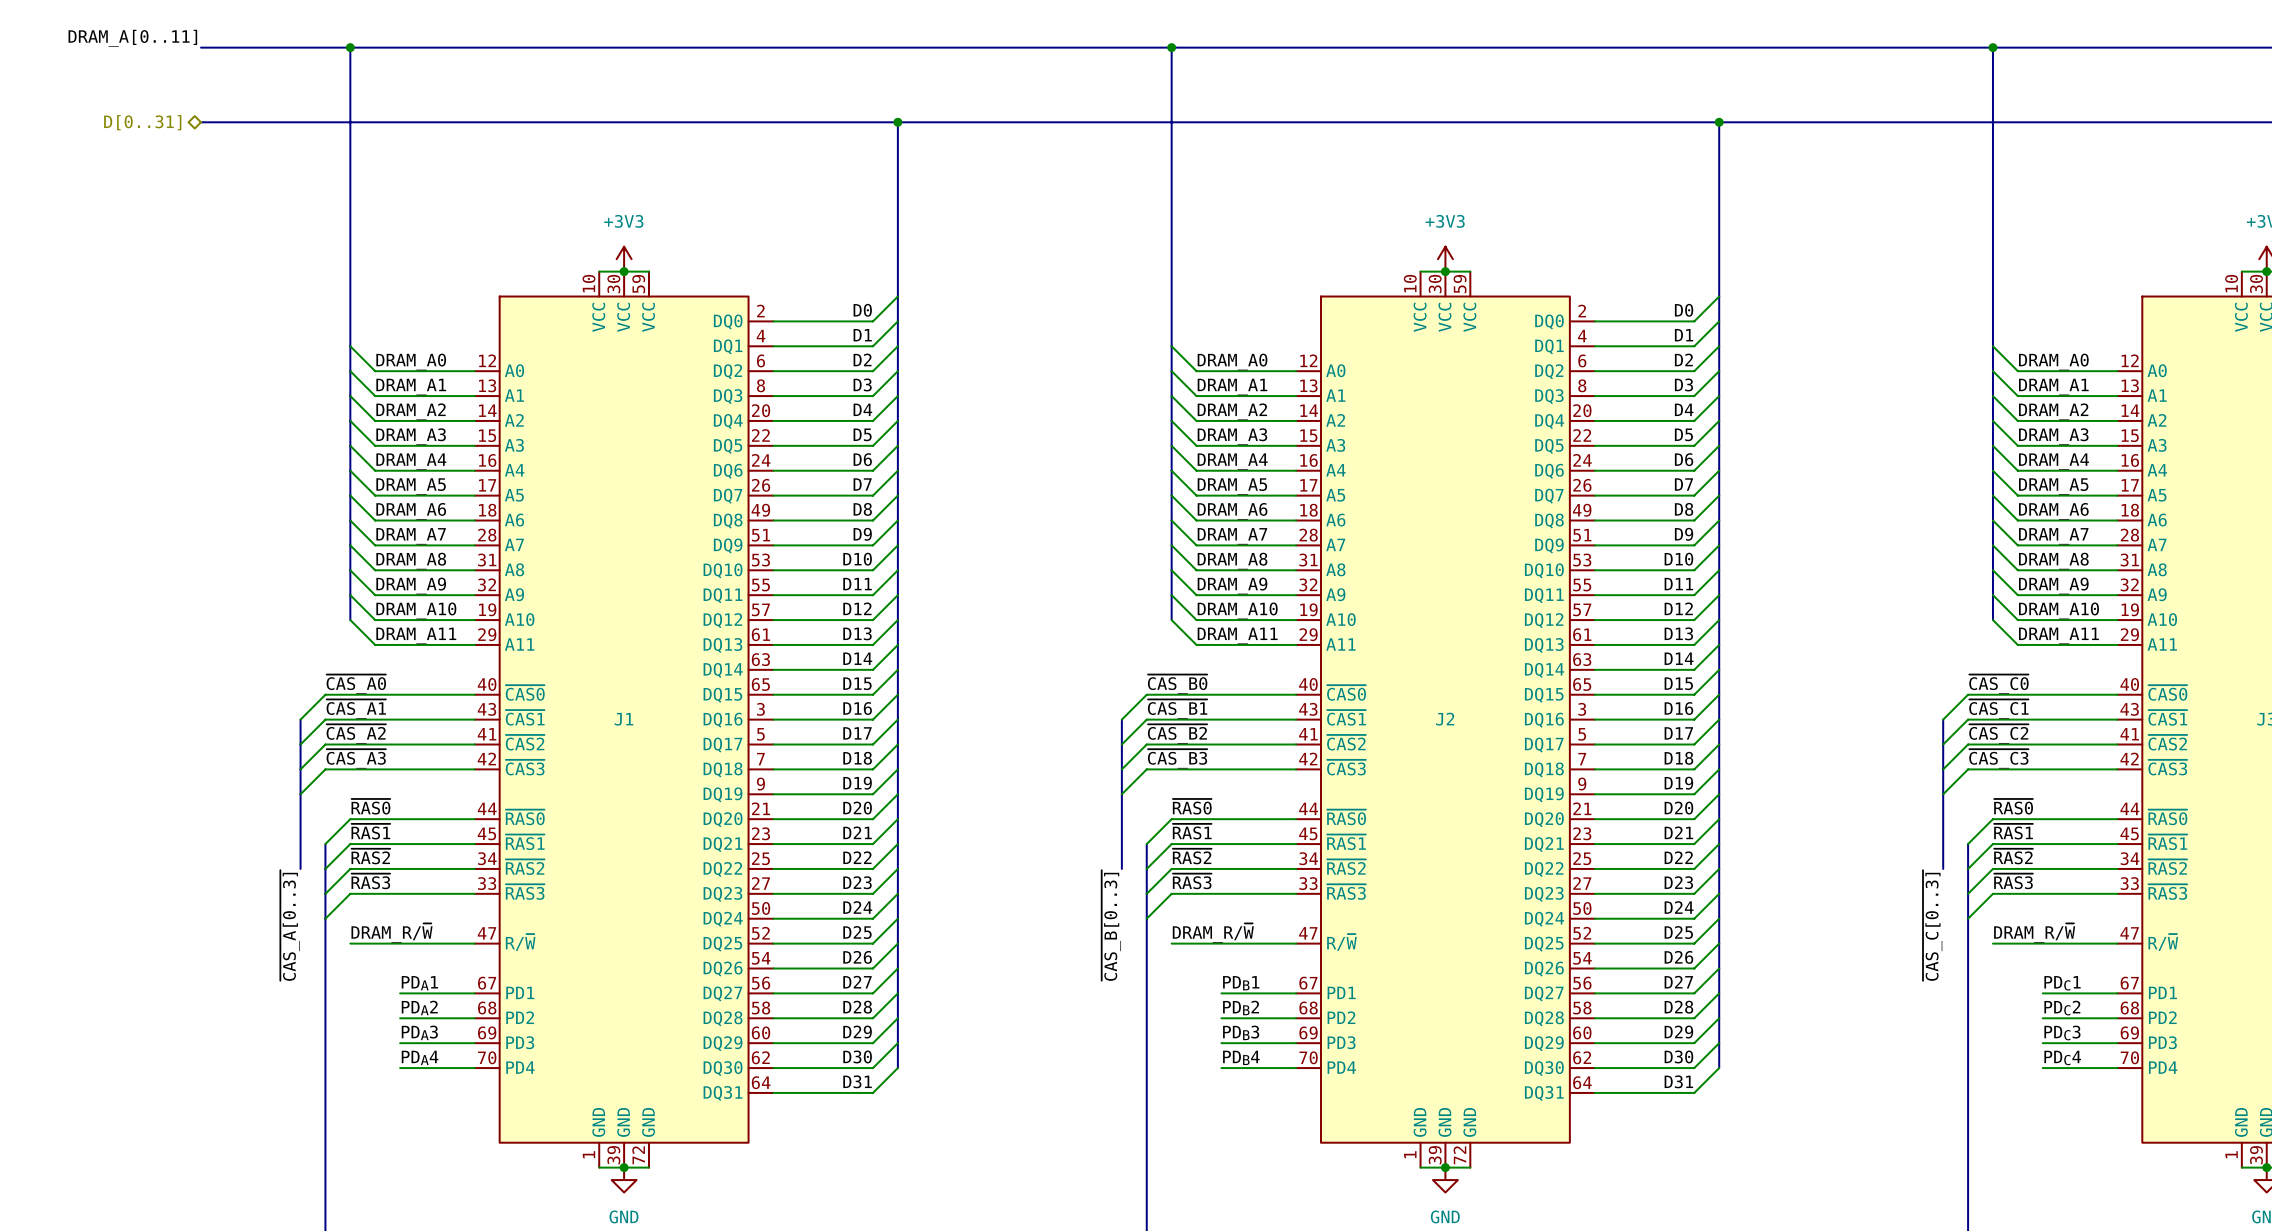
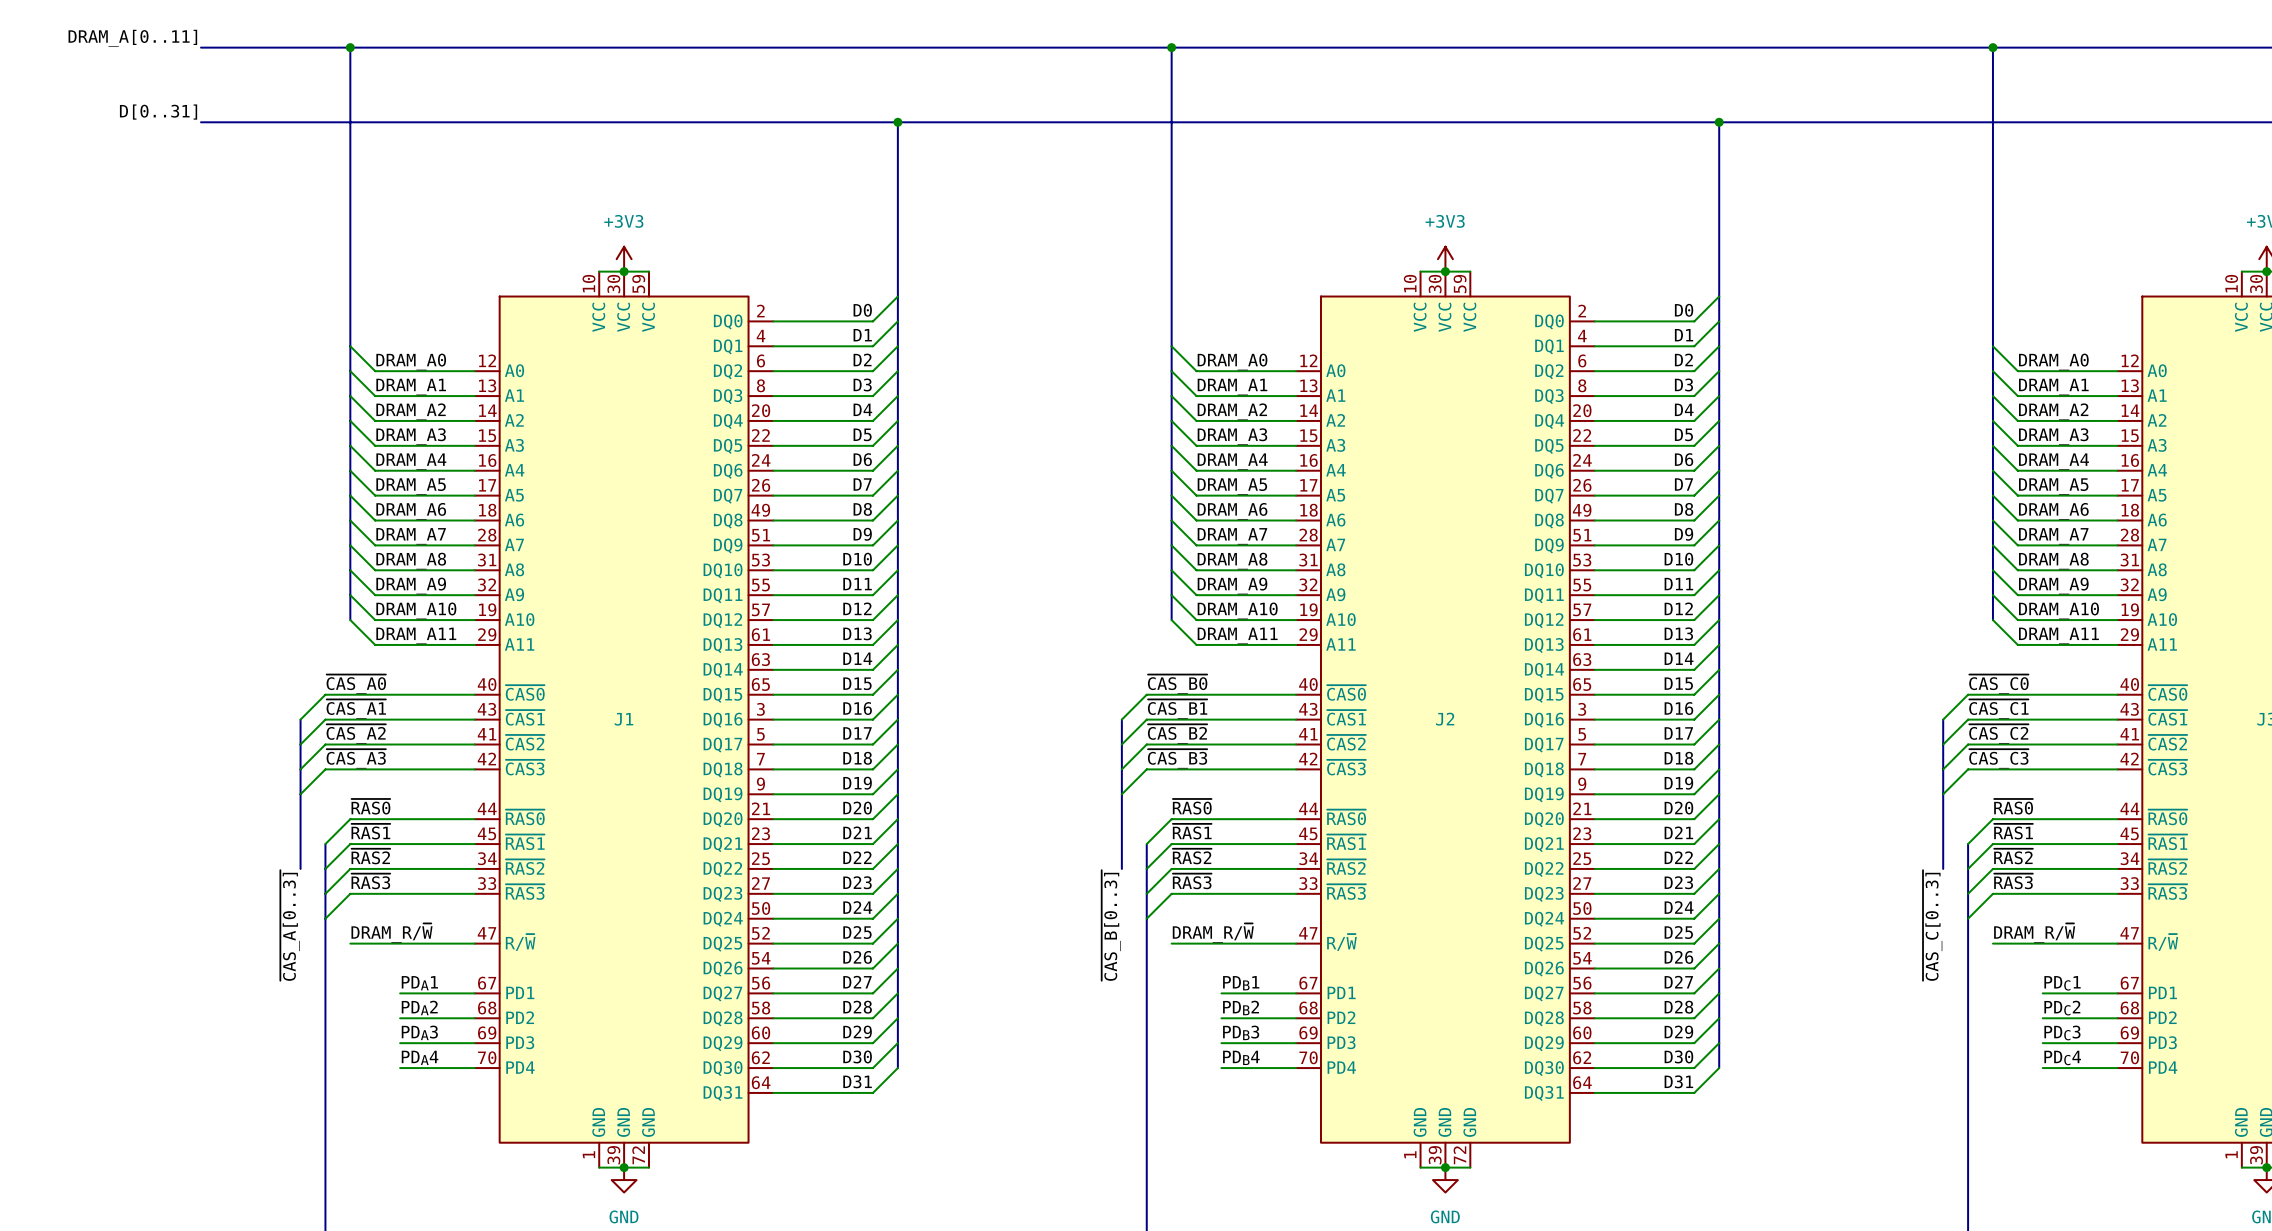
label: none -> D[0..31] (158, 112)
hierarchical label: D[0..31] (142, 122) -> none

